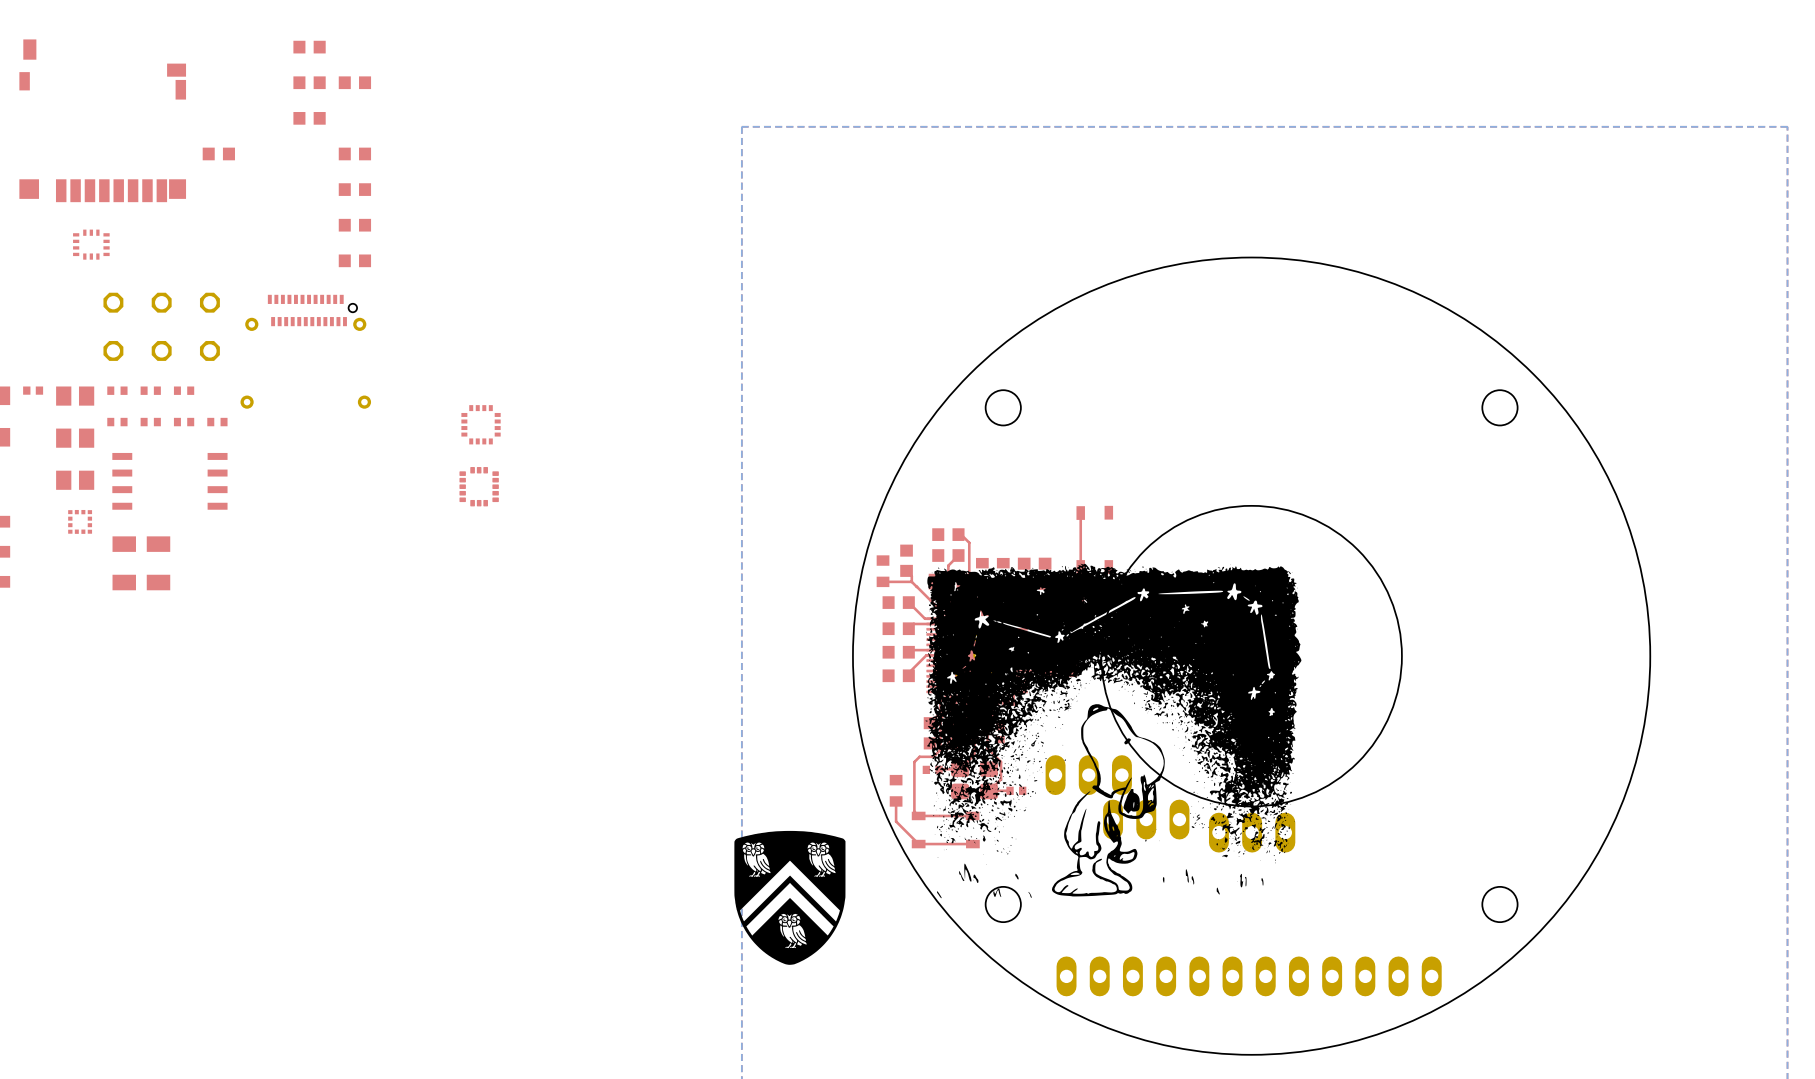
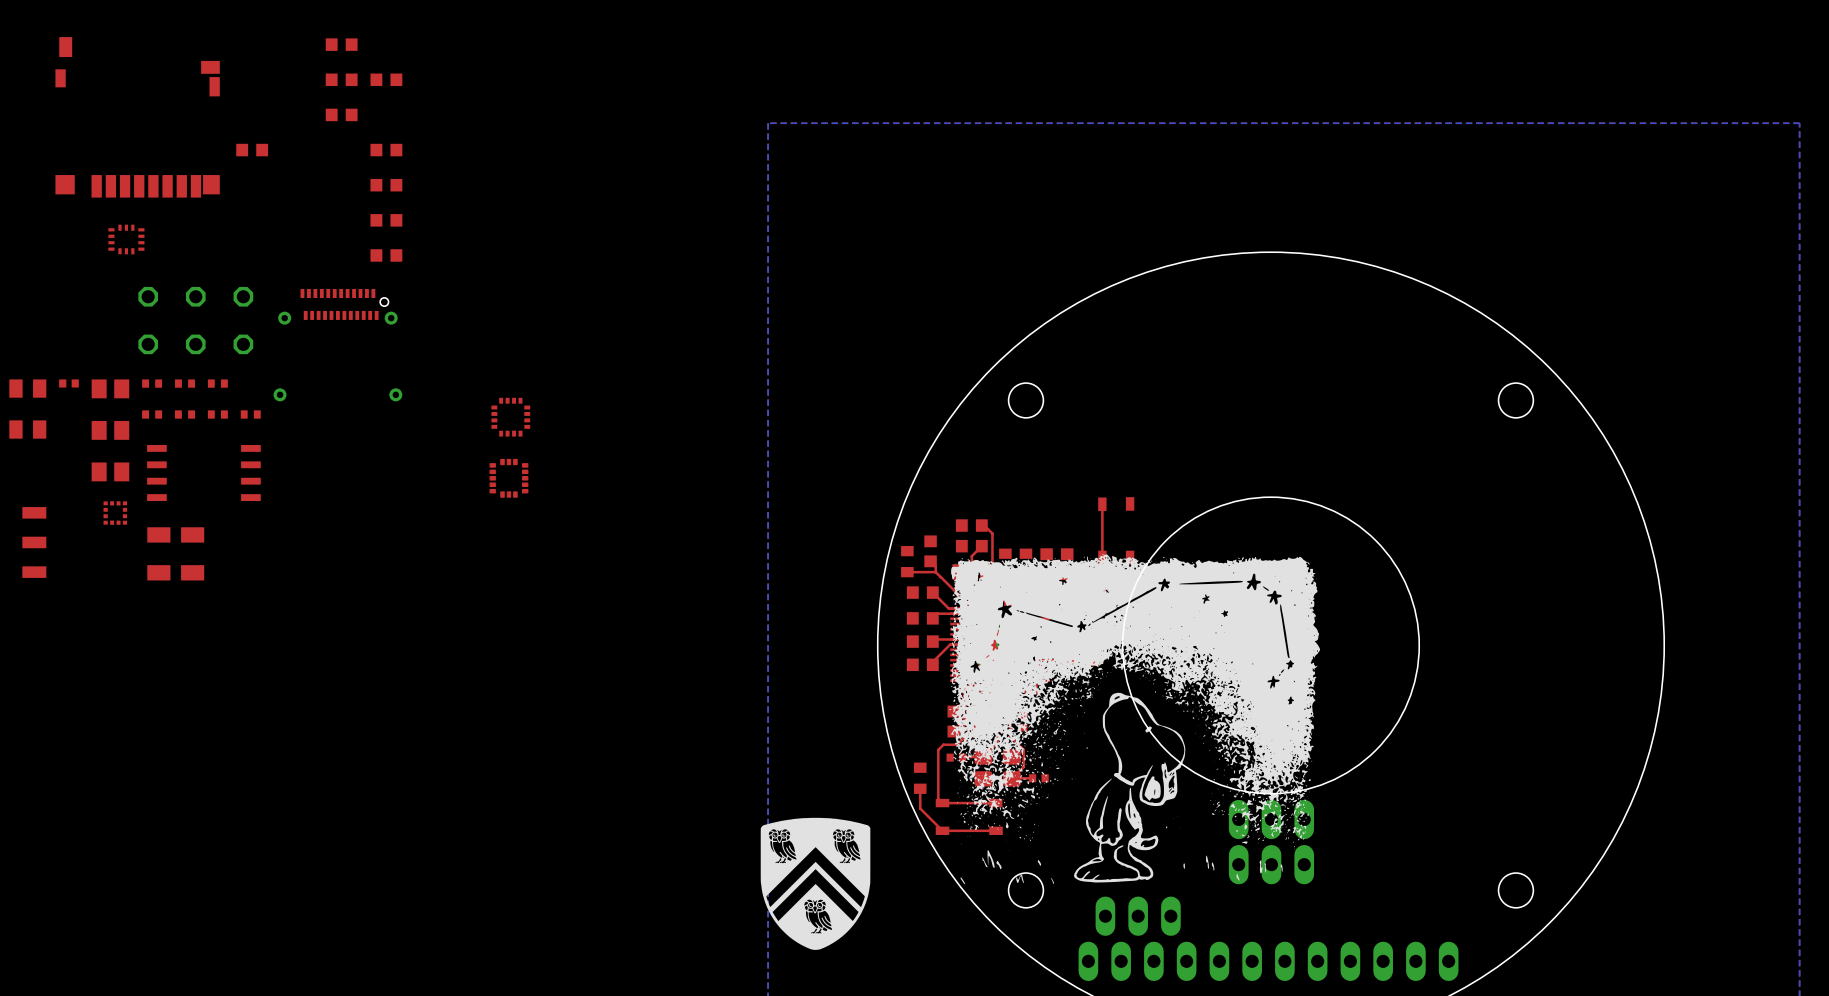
part: (1088, 775) -> none
part: (1146, 819) -> none
part: none -> (1271, 864)
part: none -> (1138, 916)

